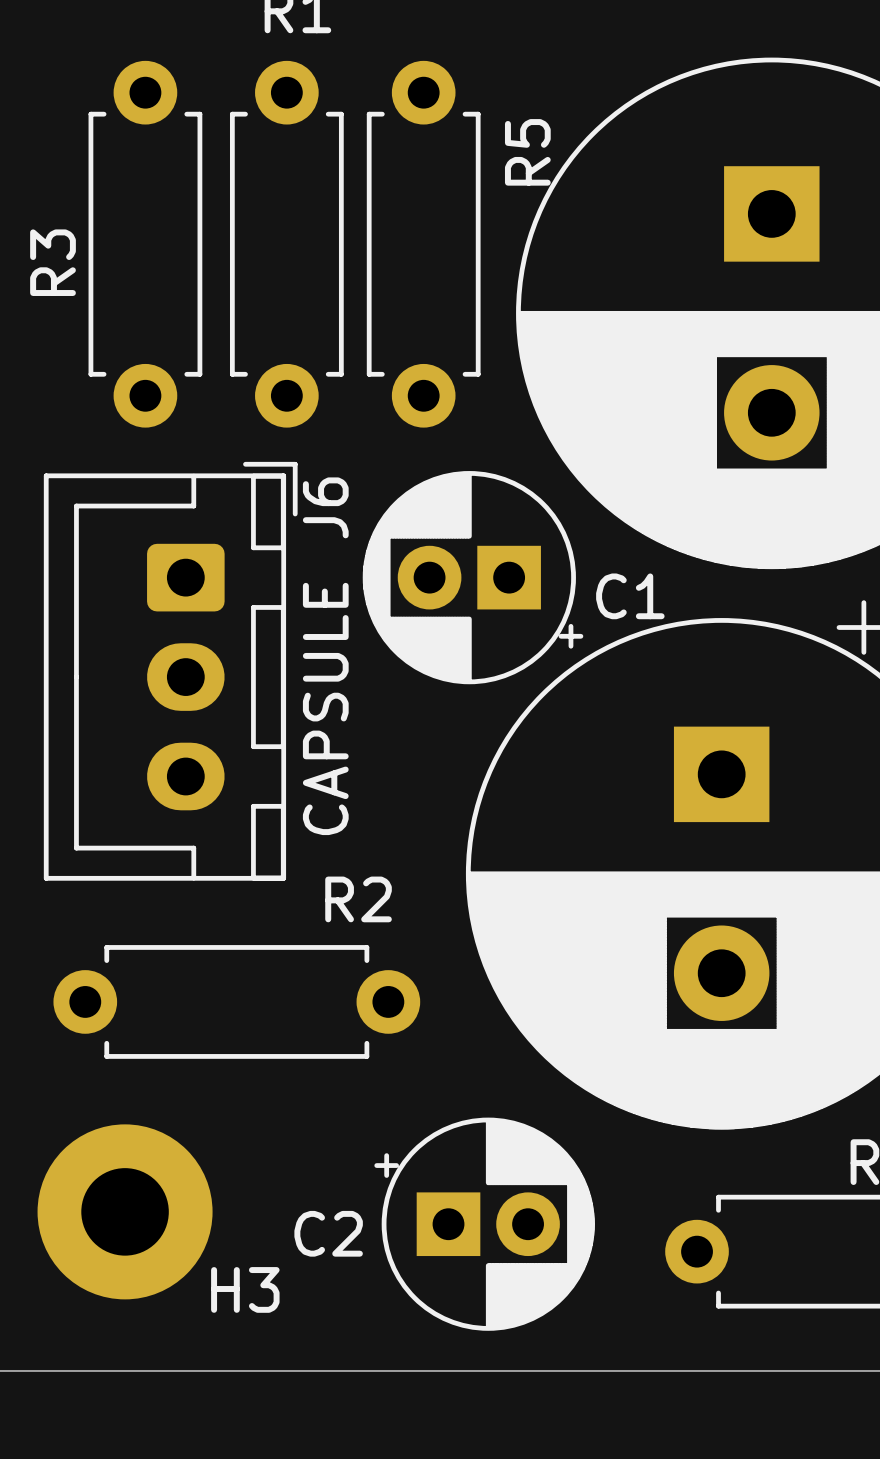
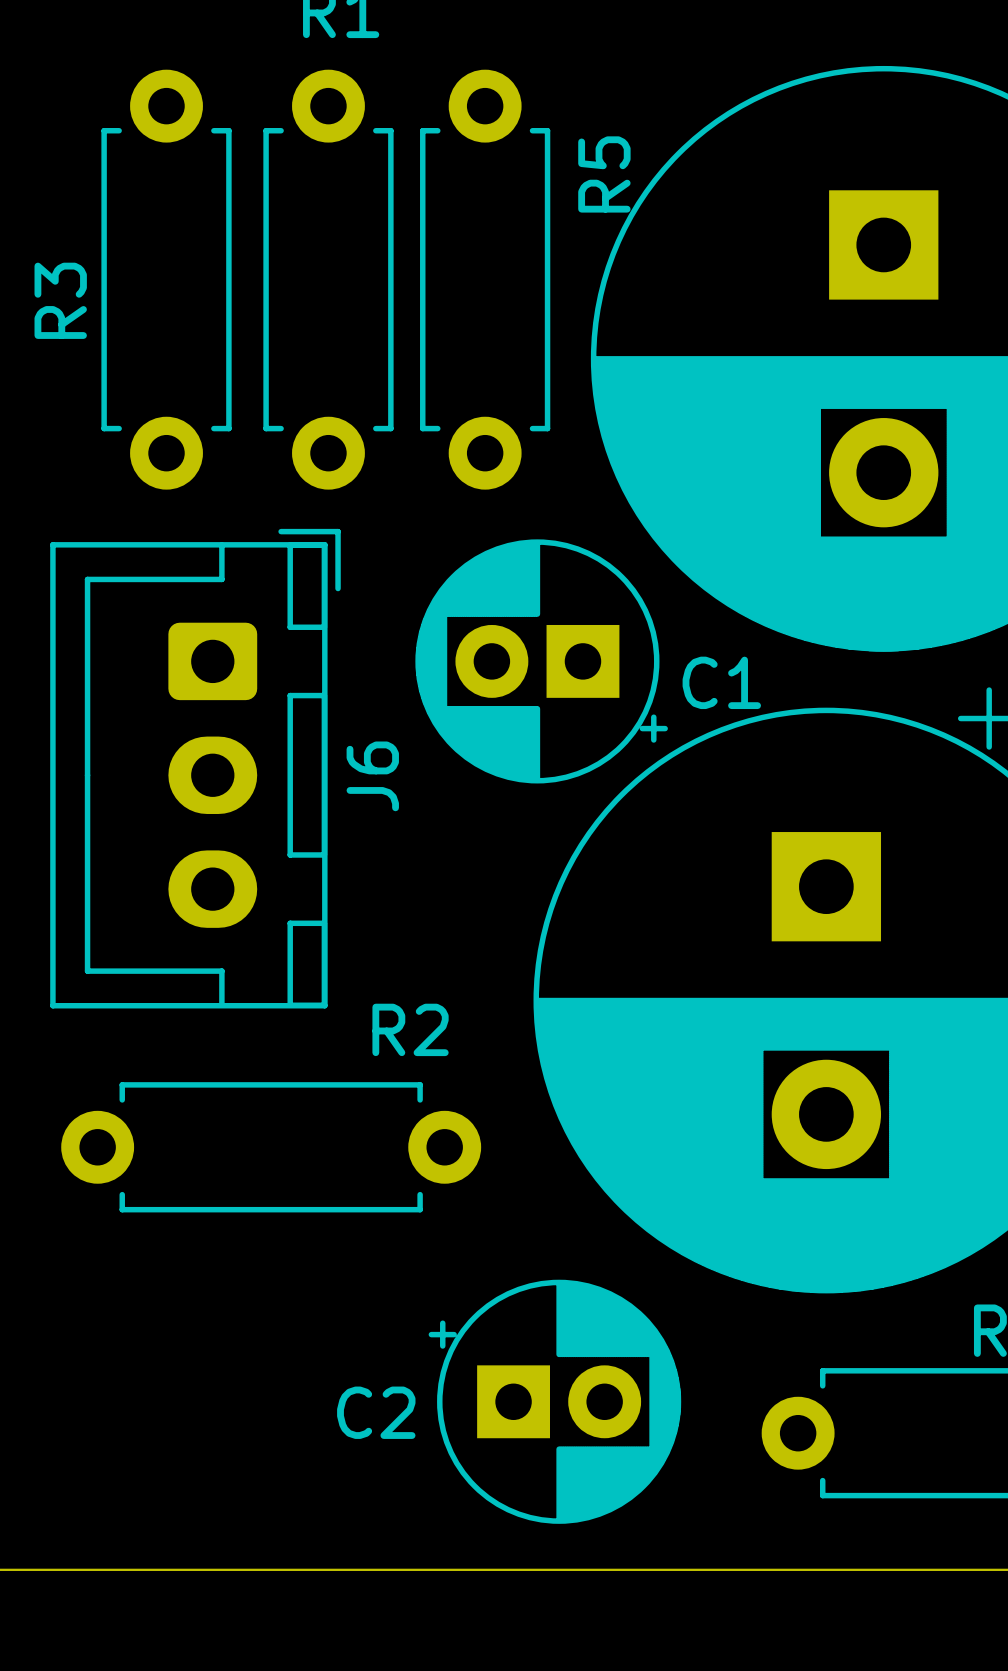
J6 name position: J6 (325, 507) -> J6 (372, 776)
text: CAPSULE (325, 708) -> none
H3: (125, 1211) -> none

